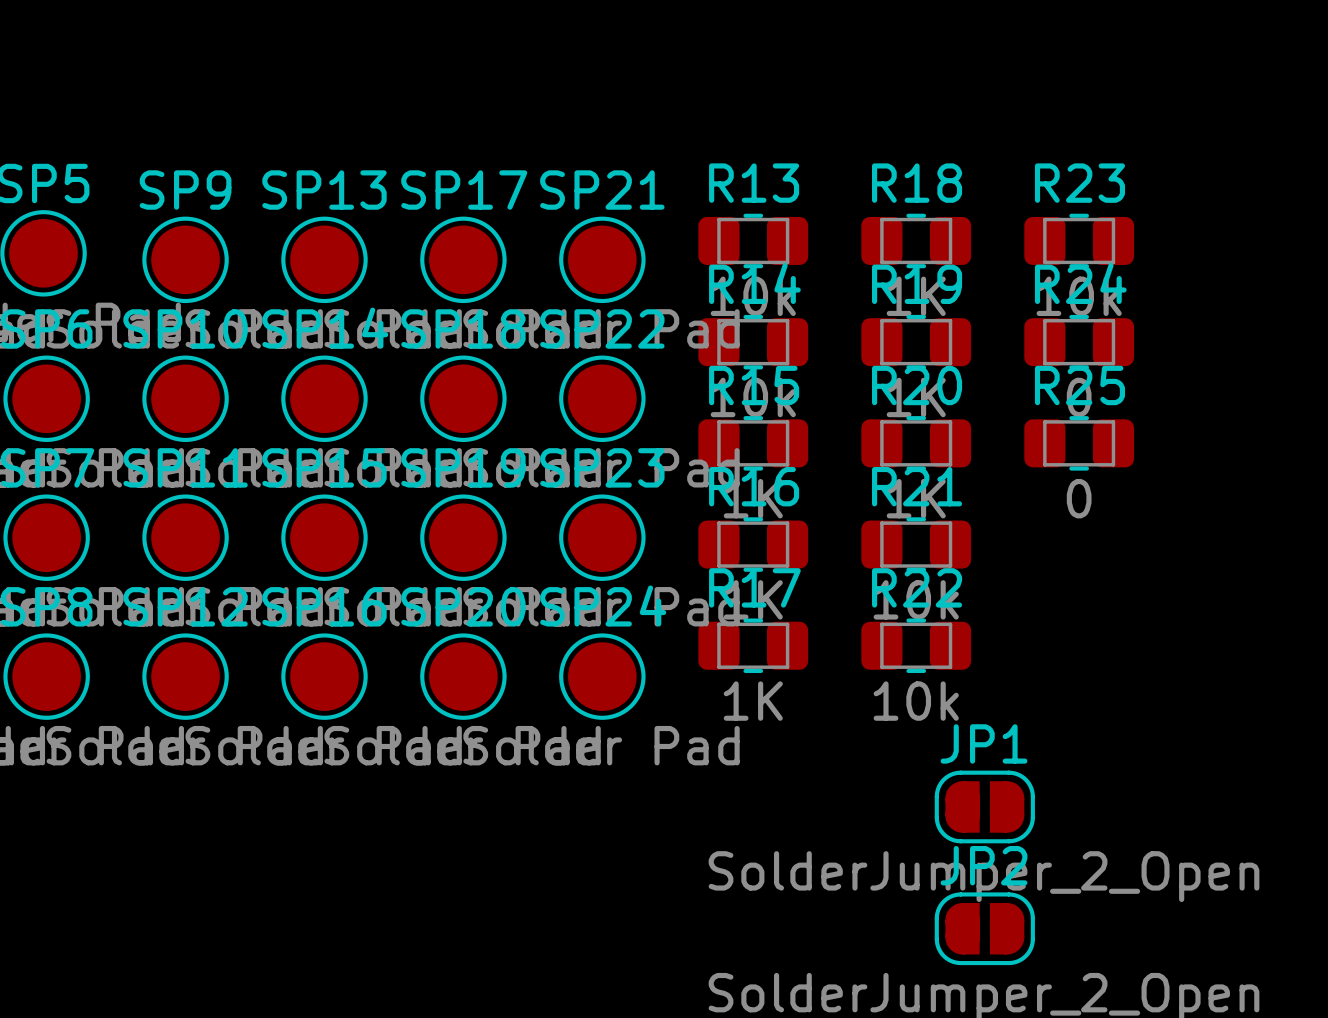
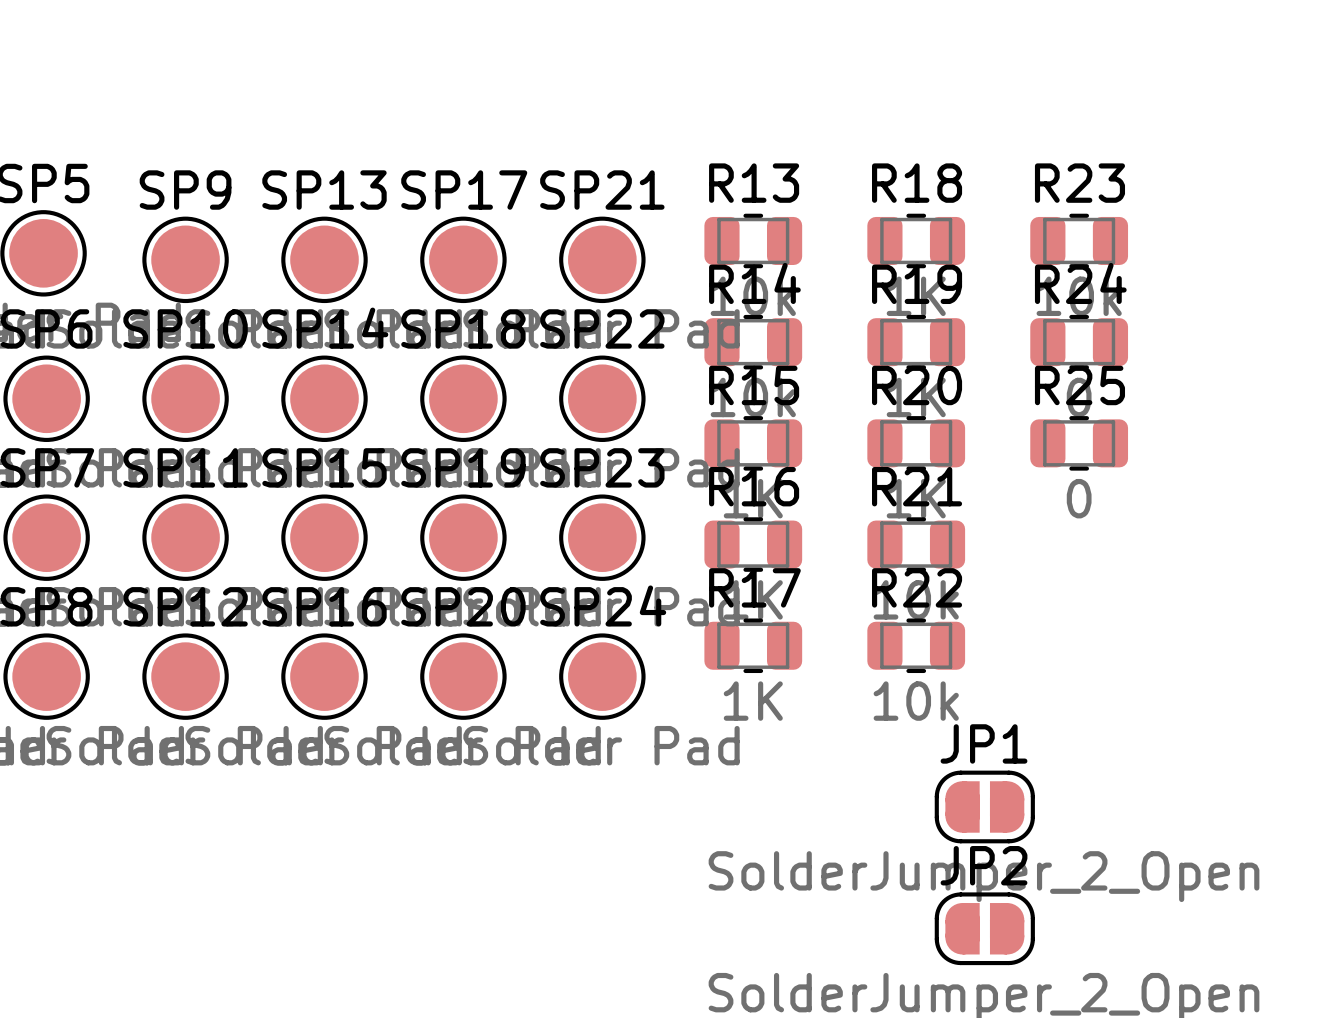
R13 footprint: [698, 213, 809, 269] -> [704, 213, 803, 269]
R18 footprint: [861, 213, 972, 269] -> [867, 213, 966, 269]
R23 footprint: [1024, 213, 1135, 269] -> [1030, 213, 1129, 269]
R14 footprint: [698, 314, 809, 370] -> [704, 314, 803, 370]
R19 footprint: [861, 314, 972, 370] -> [867, 314, 966, 370]
R24 footprint: [1024, 314, 1135, 370] -> [1030, 314, 1129, 370]
R15 footprint: [698, 416, 809, 471] -> [704, 416, 803, 471]
R20 footprint: [861, 416, 972, 471] -> [867, 416, 966, 471]
R25 footprint: [1024, 416, 1135, 471] -> [1030, 416, 1129, 471]
R16 footprint: [698, 517, 809, 572] -> [704, 517, 803, 572]
R21 footprint: [861, 517, 972, 572] -> [867, 517, 966, 572]
R17 footprint: [698, 618, 809, 674] -> [704, 618, 803, 674]
R22 footprint: [861, 618, 972, 674] -> [867, 618, 966, 674]

